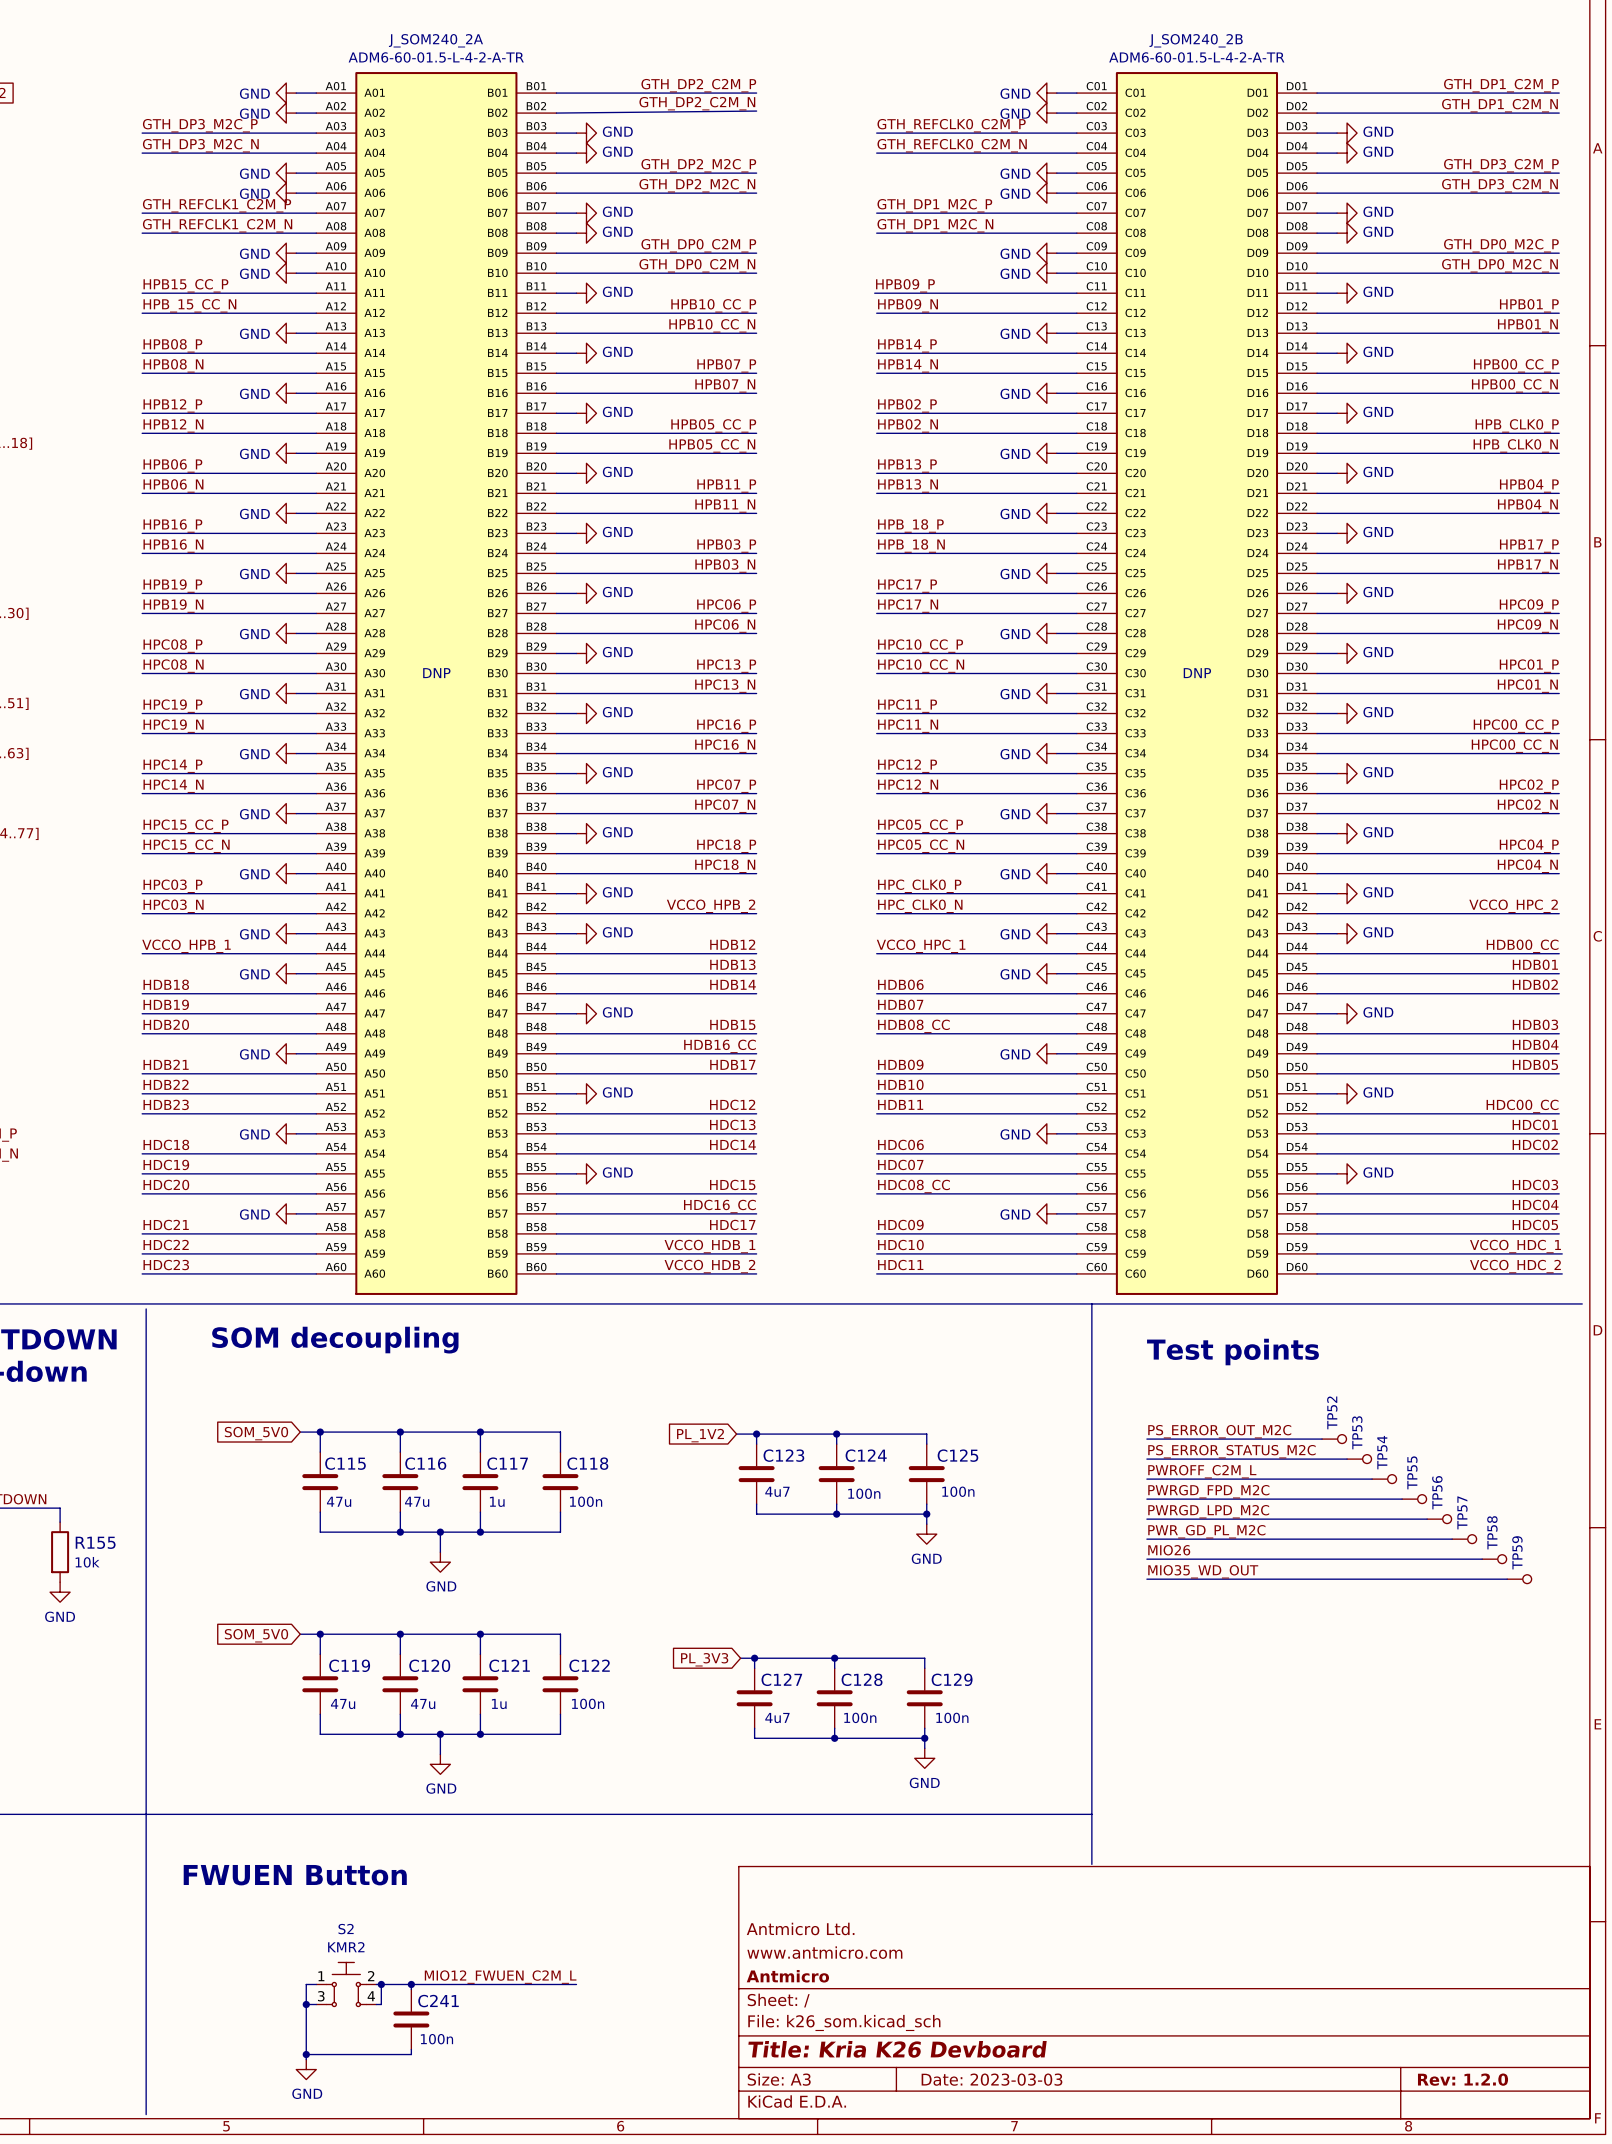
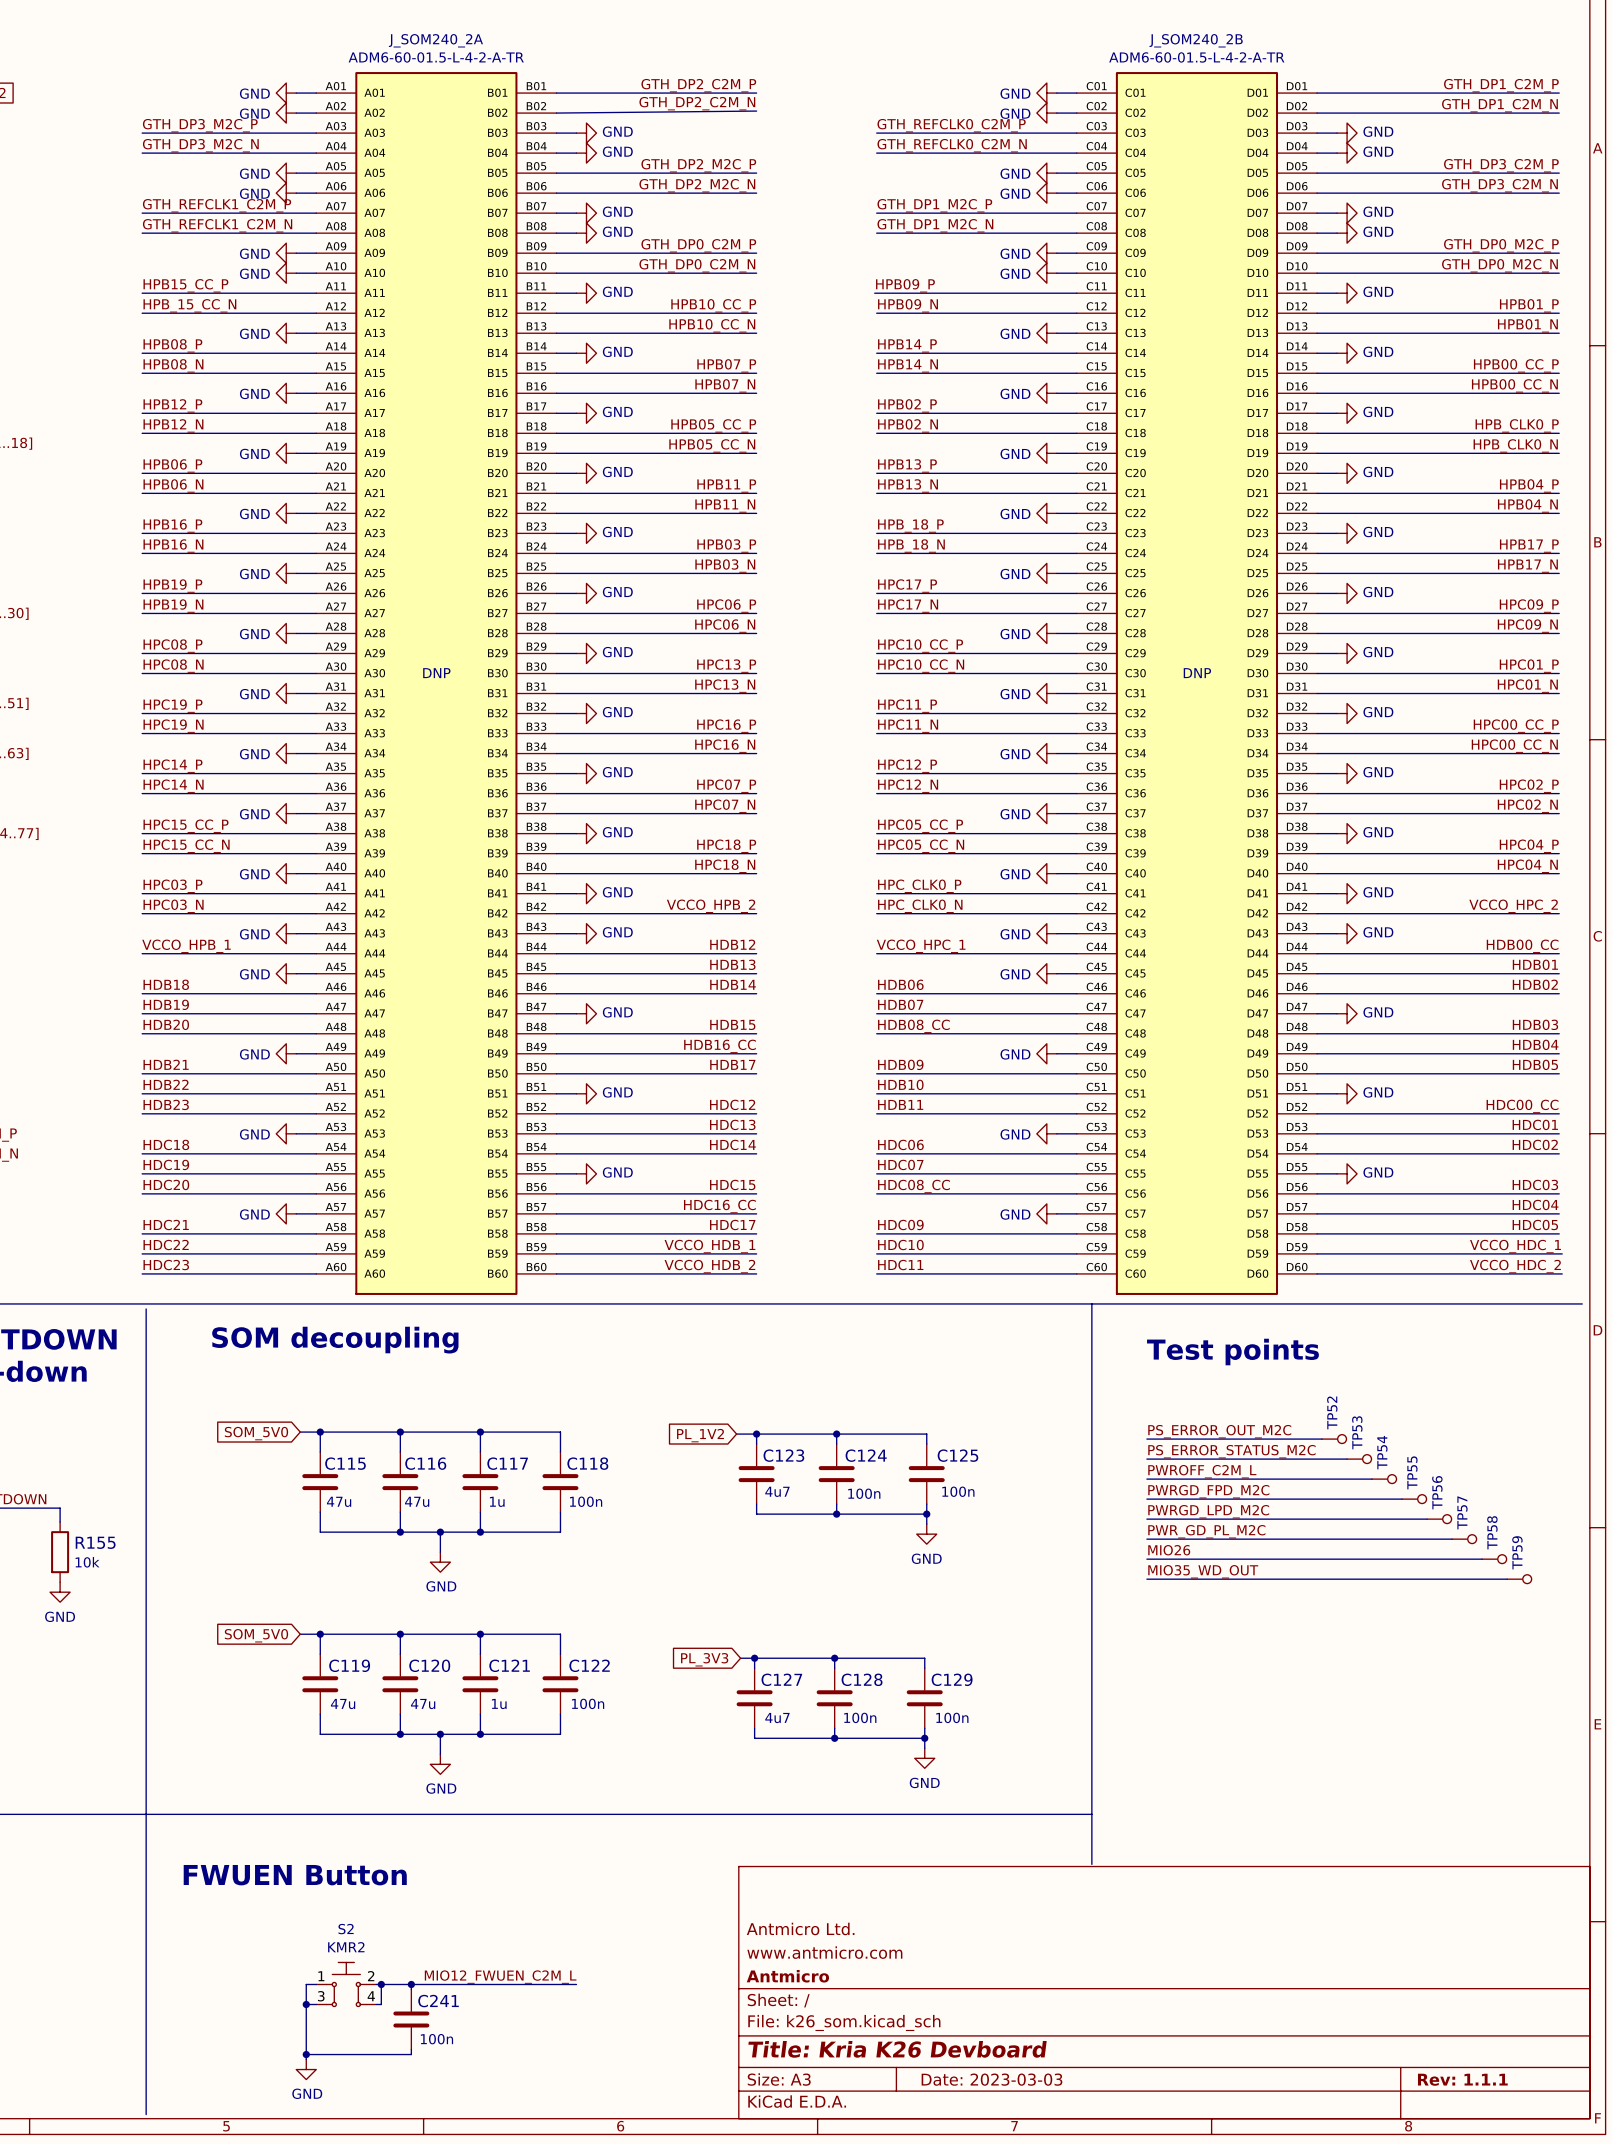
title block: Rev: 1.2.0 (1463, 2079) -> Rev: 1.1.1 (1462, 2079)

